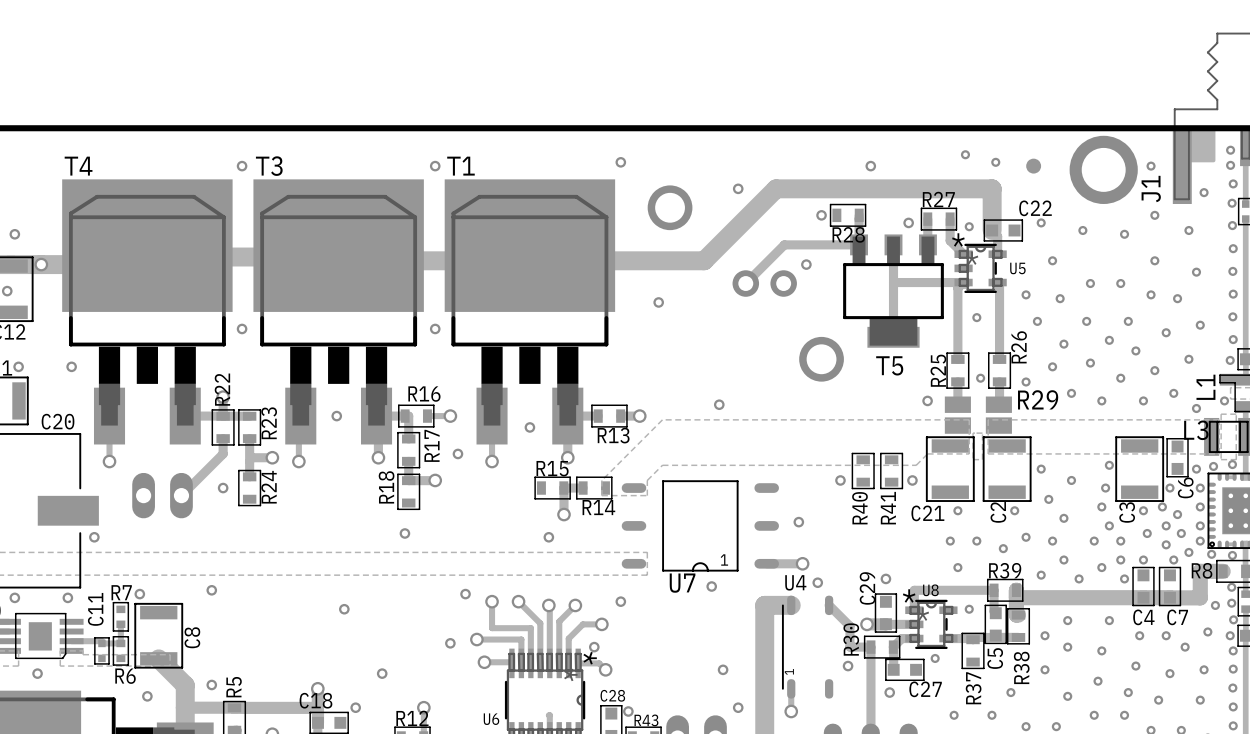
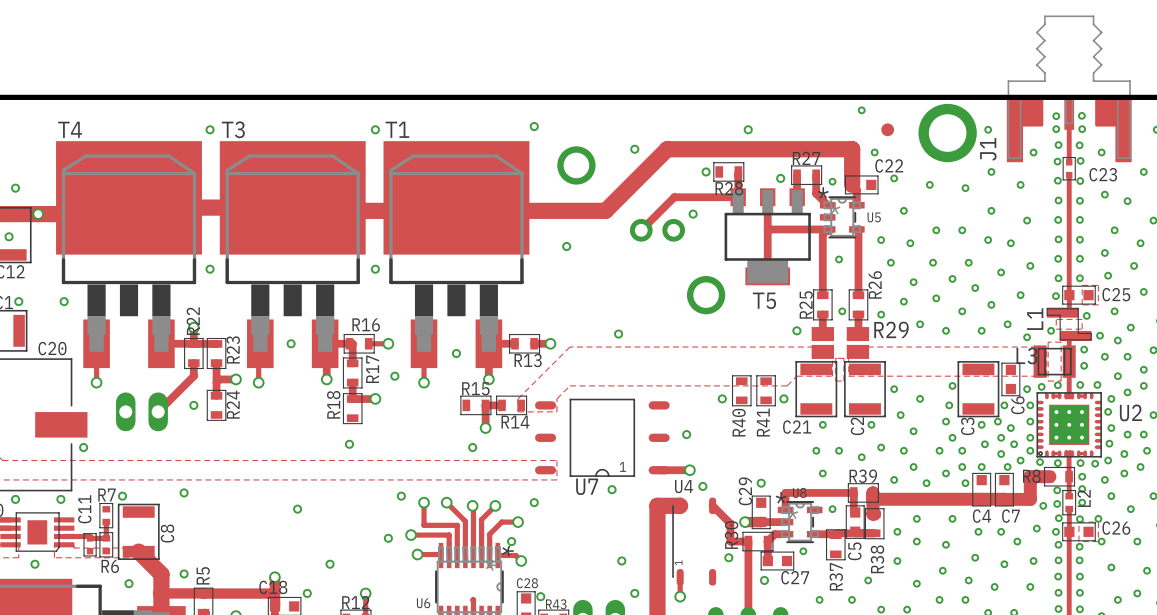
via: none -> (861, 110)
via: (965, 154) -> none
via: (995, 162) -> none
via: none -> (874, 152)

